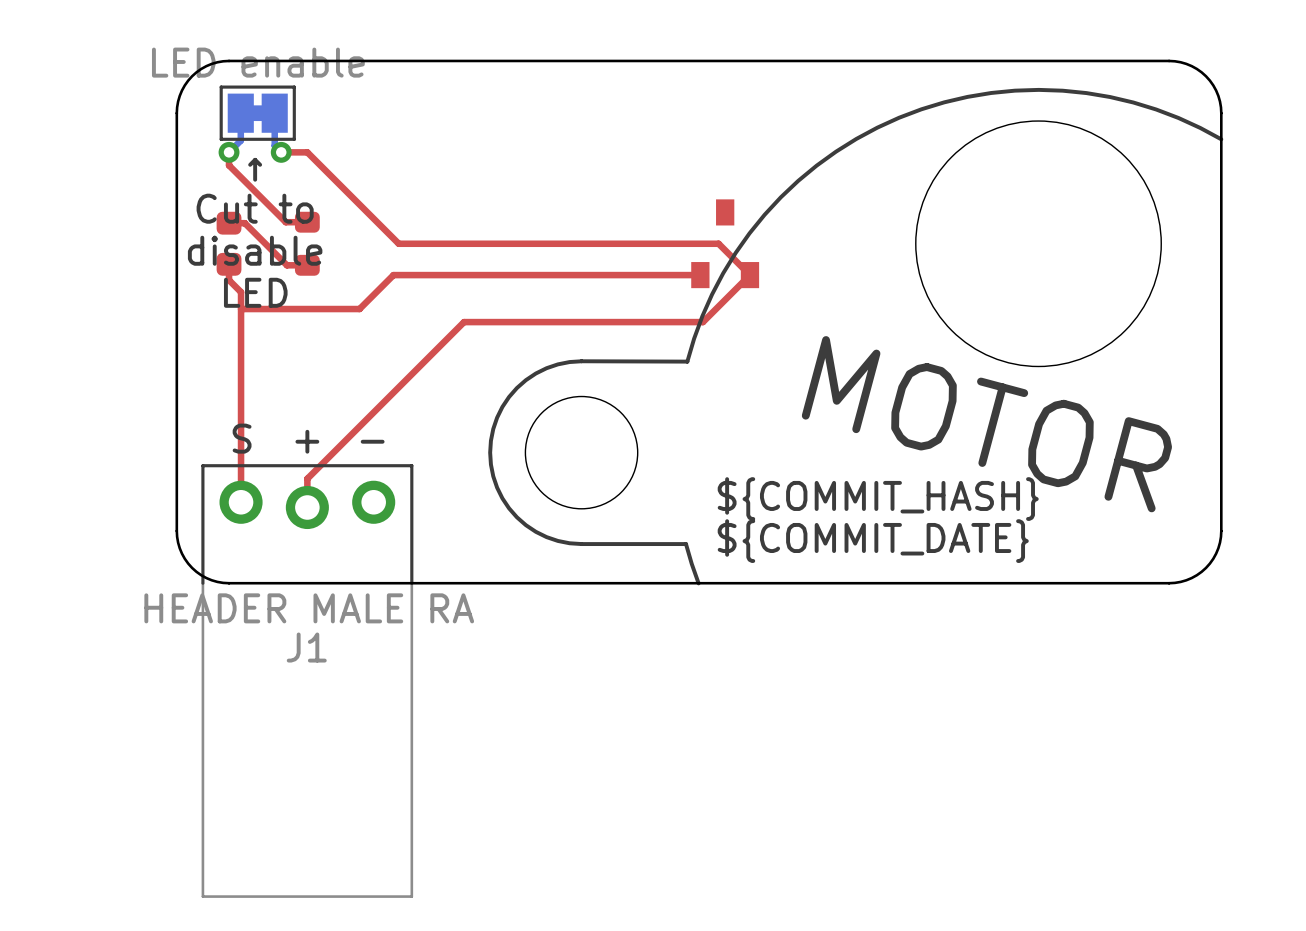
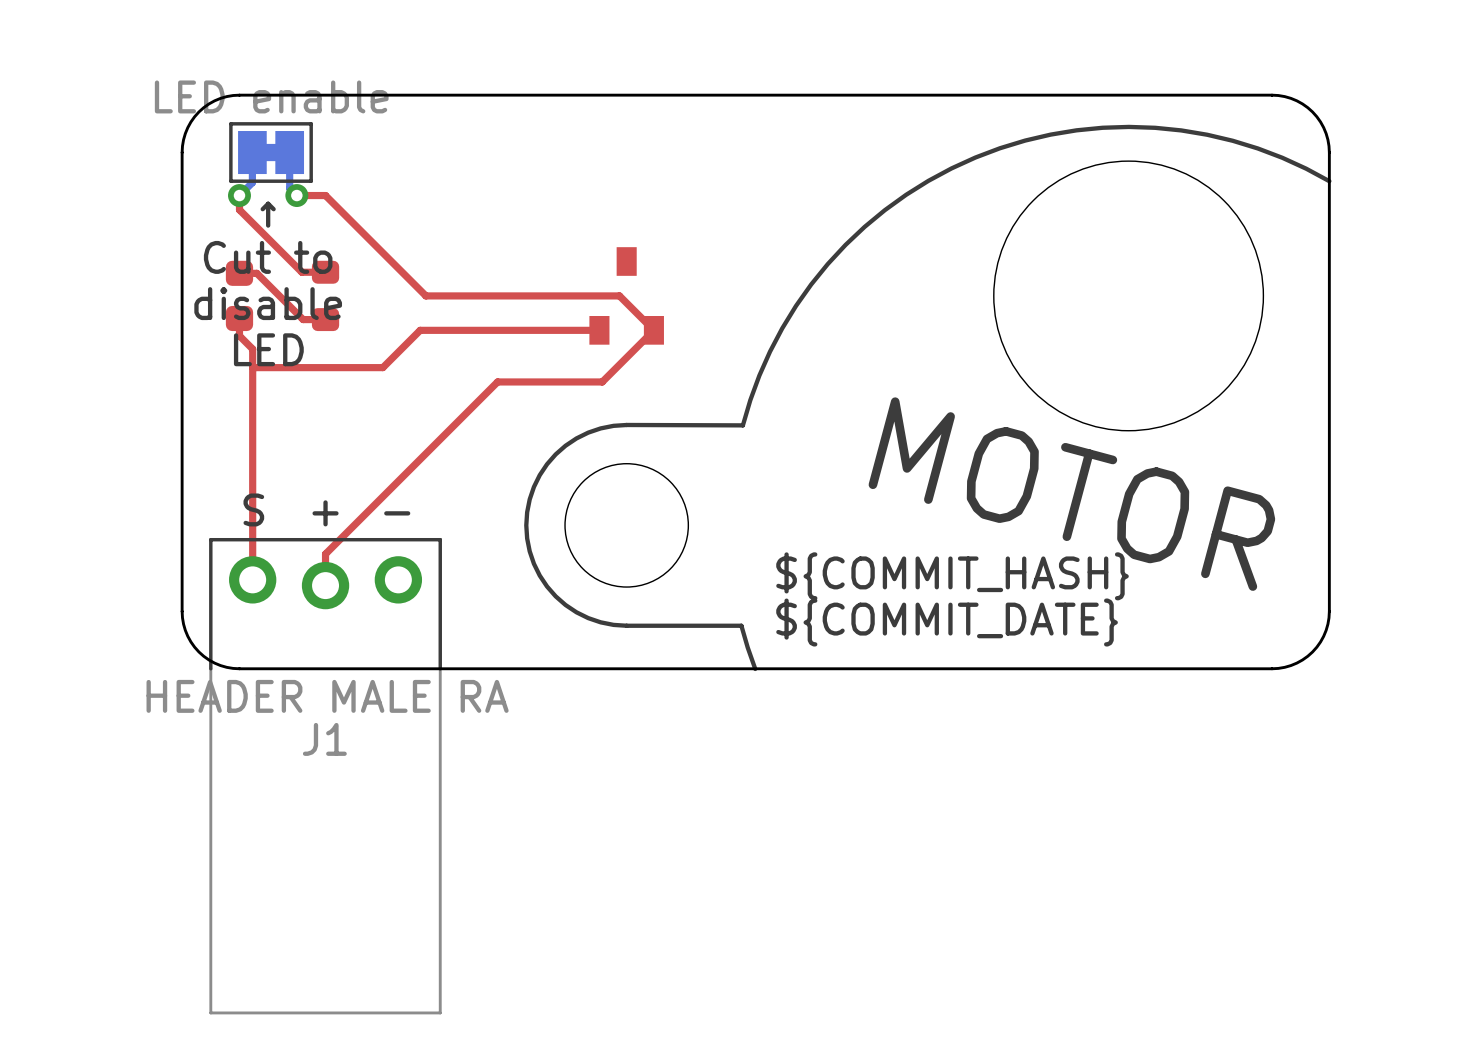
top track: (575, 243) (718, 243) (749, 275) (702, 322) (559, 322) -> (619, 295) (653, 330) (602, 381)
part position: (725, 243) -> (626, 295)
top track: (700, 275) (556, 275) -> none

